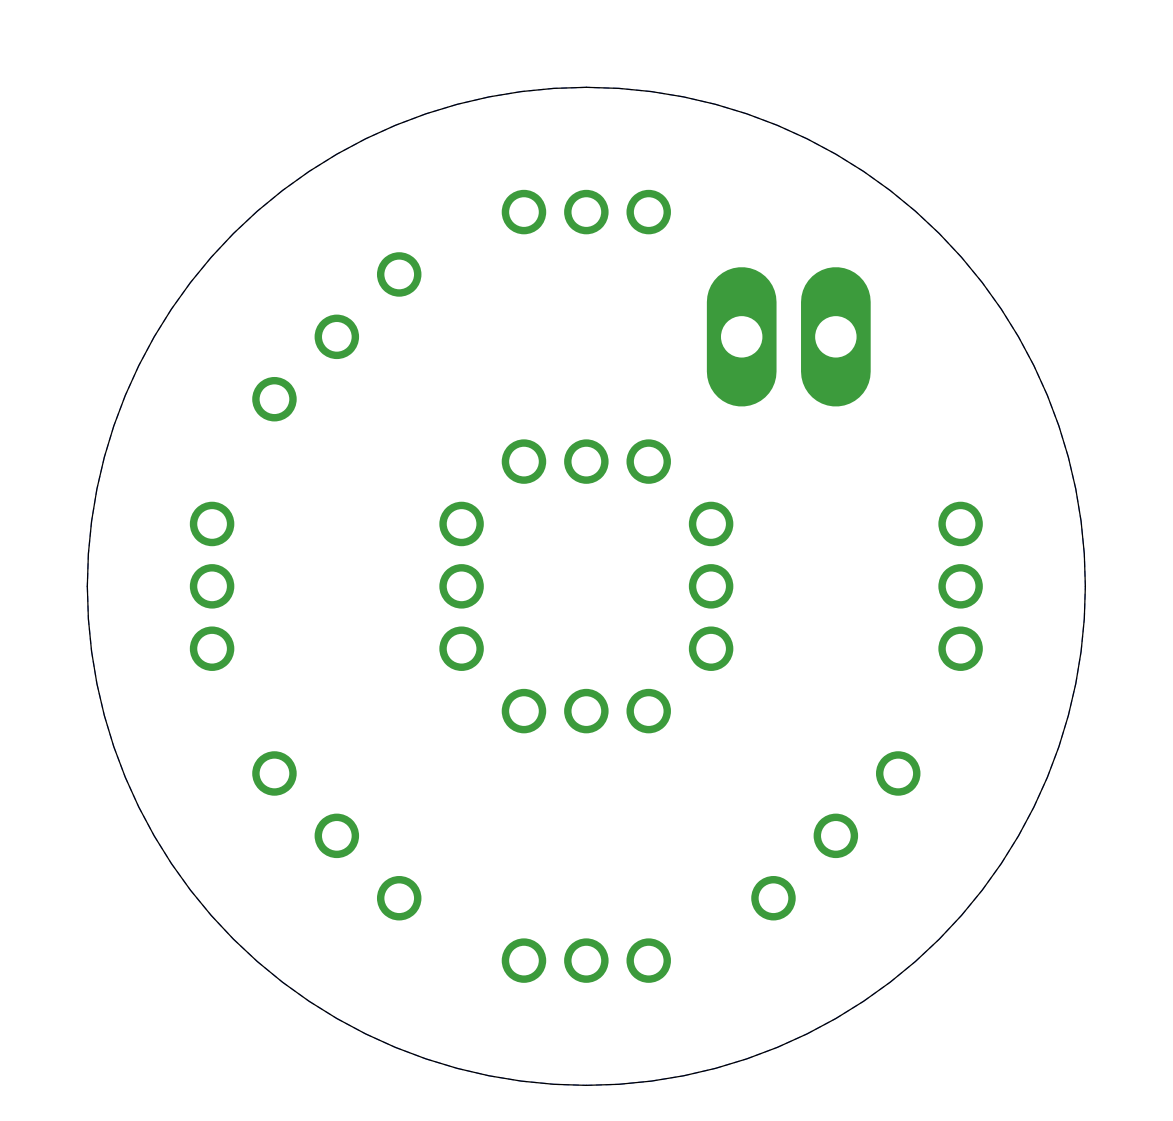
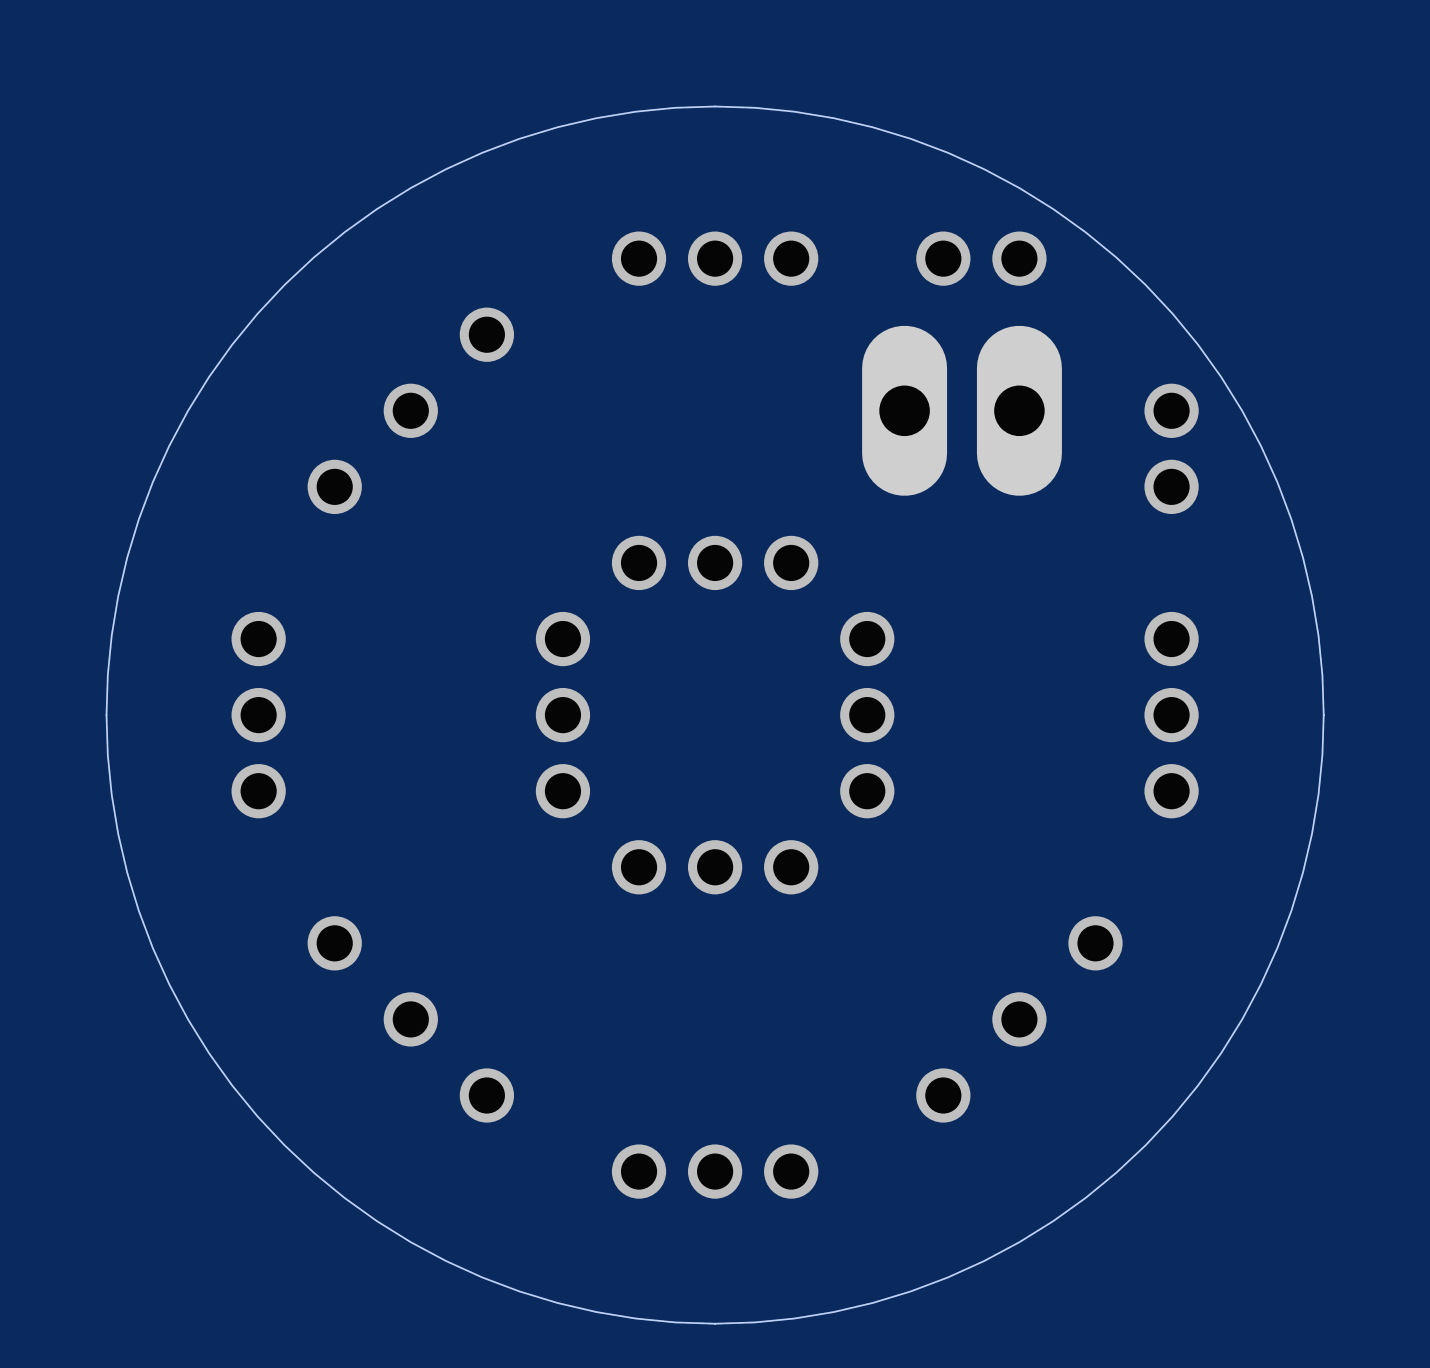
via: none -> (943, 258)
via: none -> (1019, 258)
via: none -> (1171, 410)
via: none -> (1171, 486)

